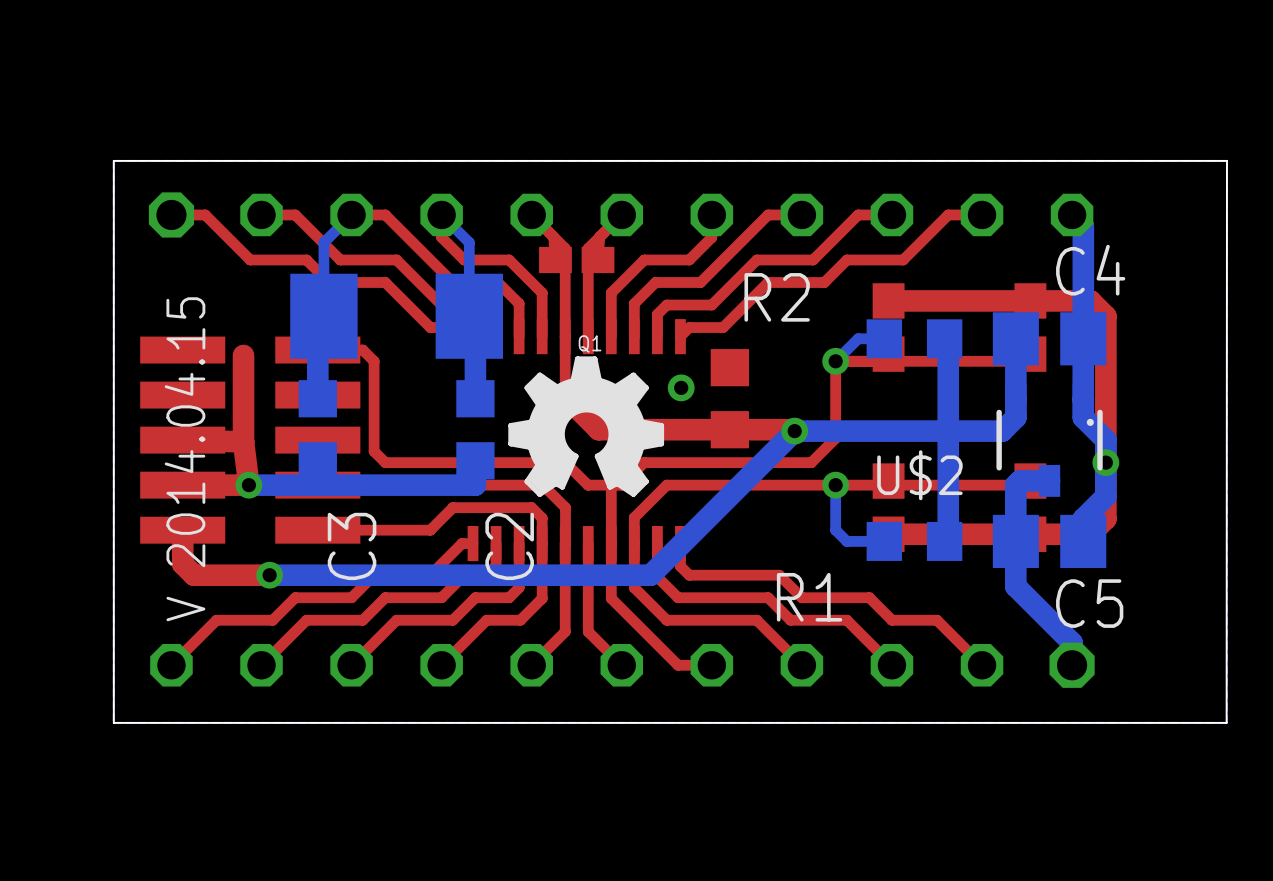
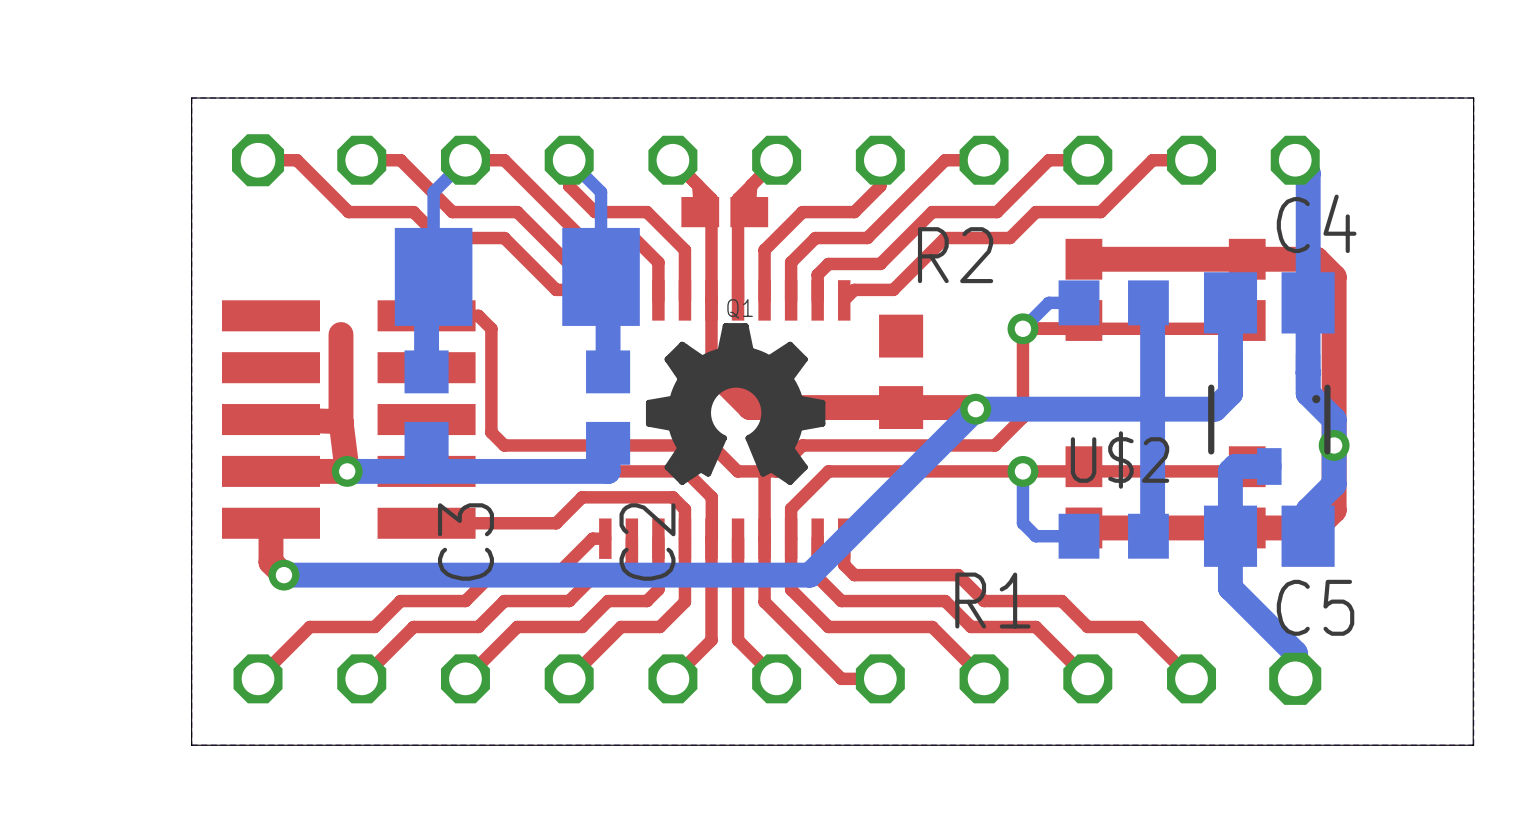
top track: (243, 355) (243, 366) -> none
via: (681, 387) -> none
text: V 2014.04.15 (185, 459) -> none
top track: (269, 575) (193, 575) -> none
bottom track: none -> (371, 575) (283, 575)
via position: (269, 575) -> (283, 575)

